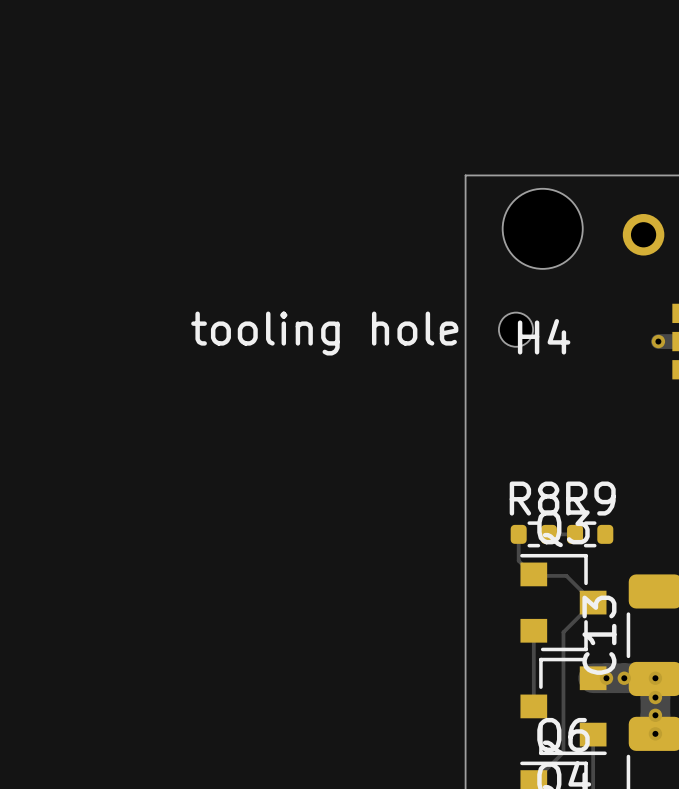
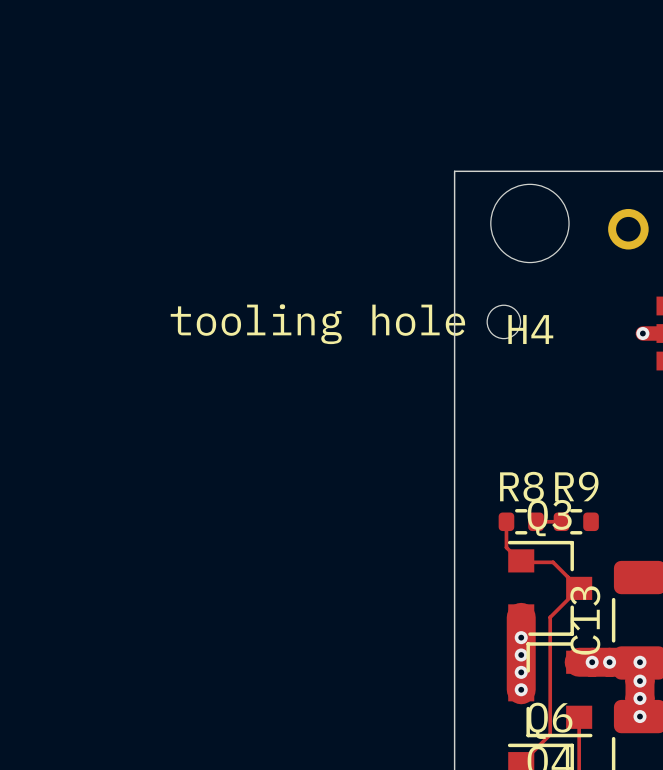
track width: thin (533, 632) (533, 706) -> thick (521, 617) (521, 689)
via: none -> (521, 637)
via: none -> (521, 655)
via: none -> (521, 672)
via: none -> (521, 689)

